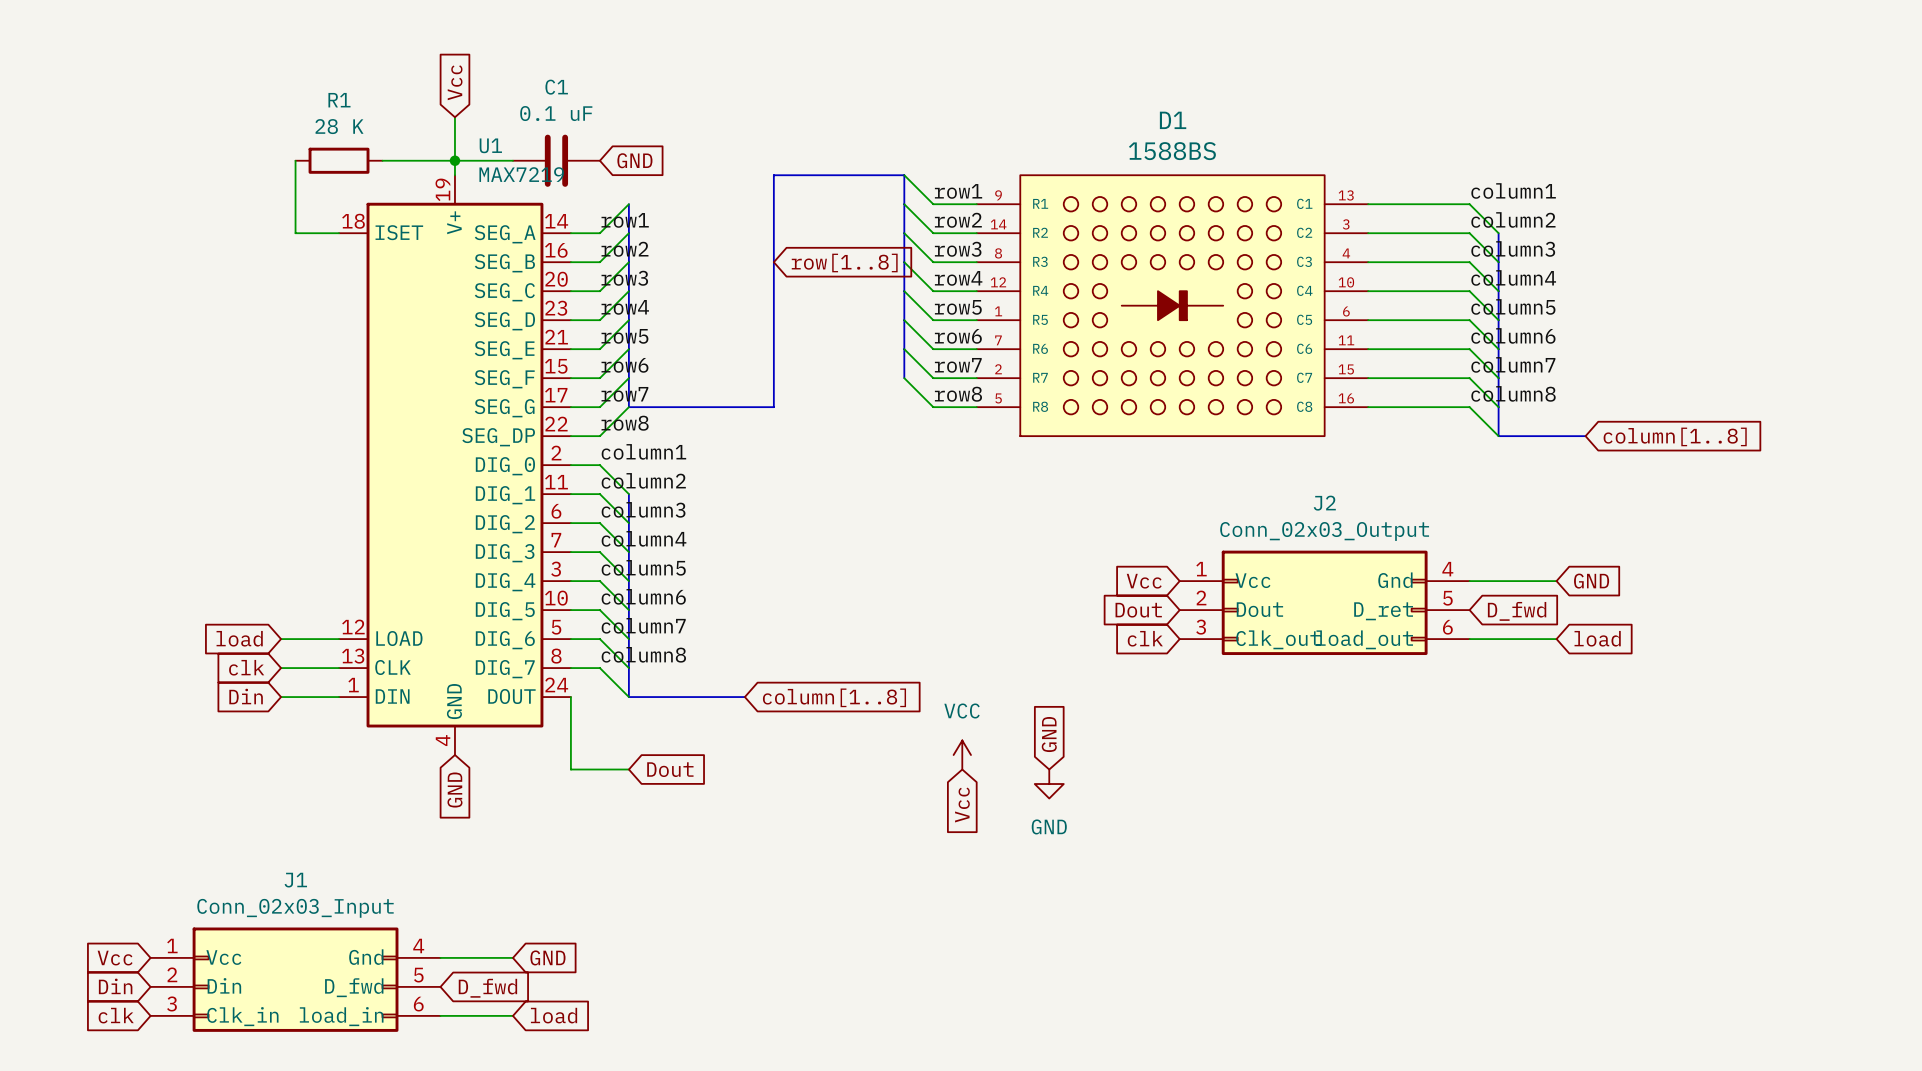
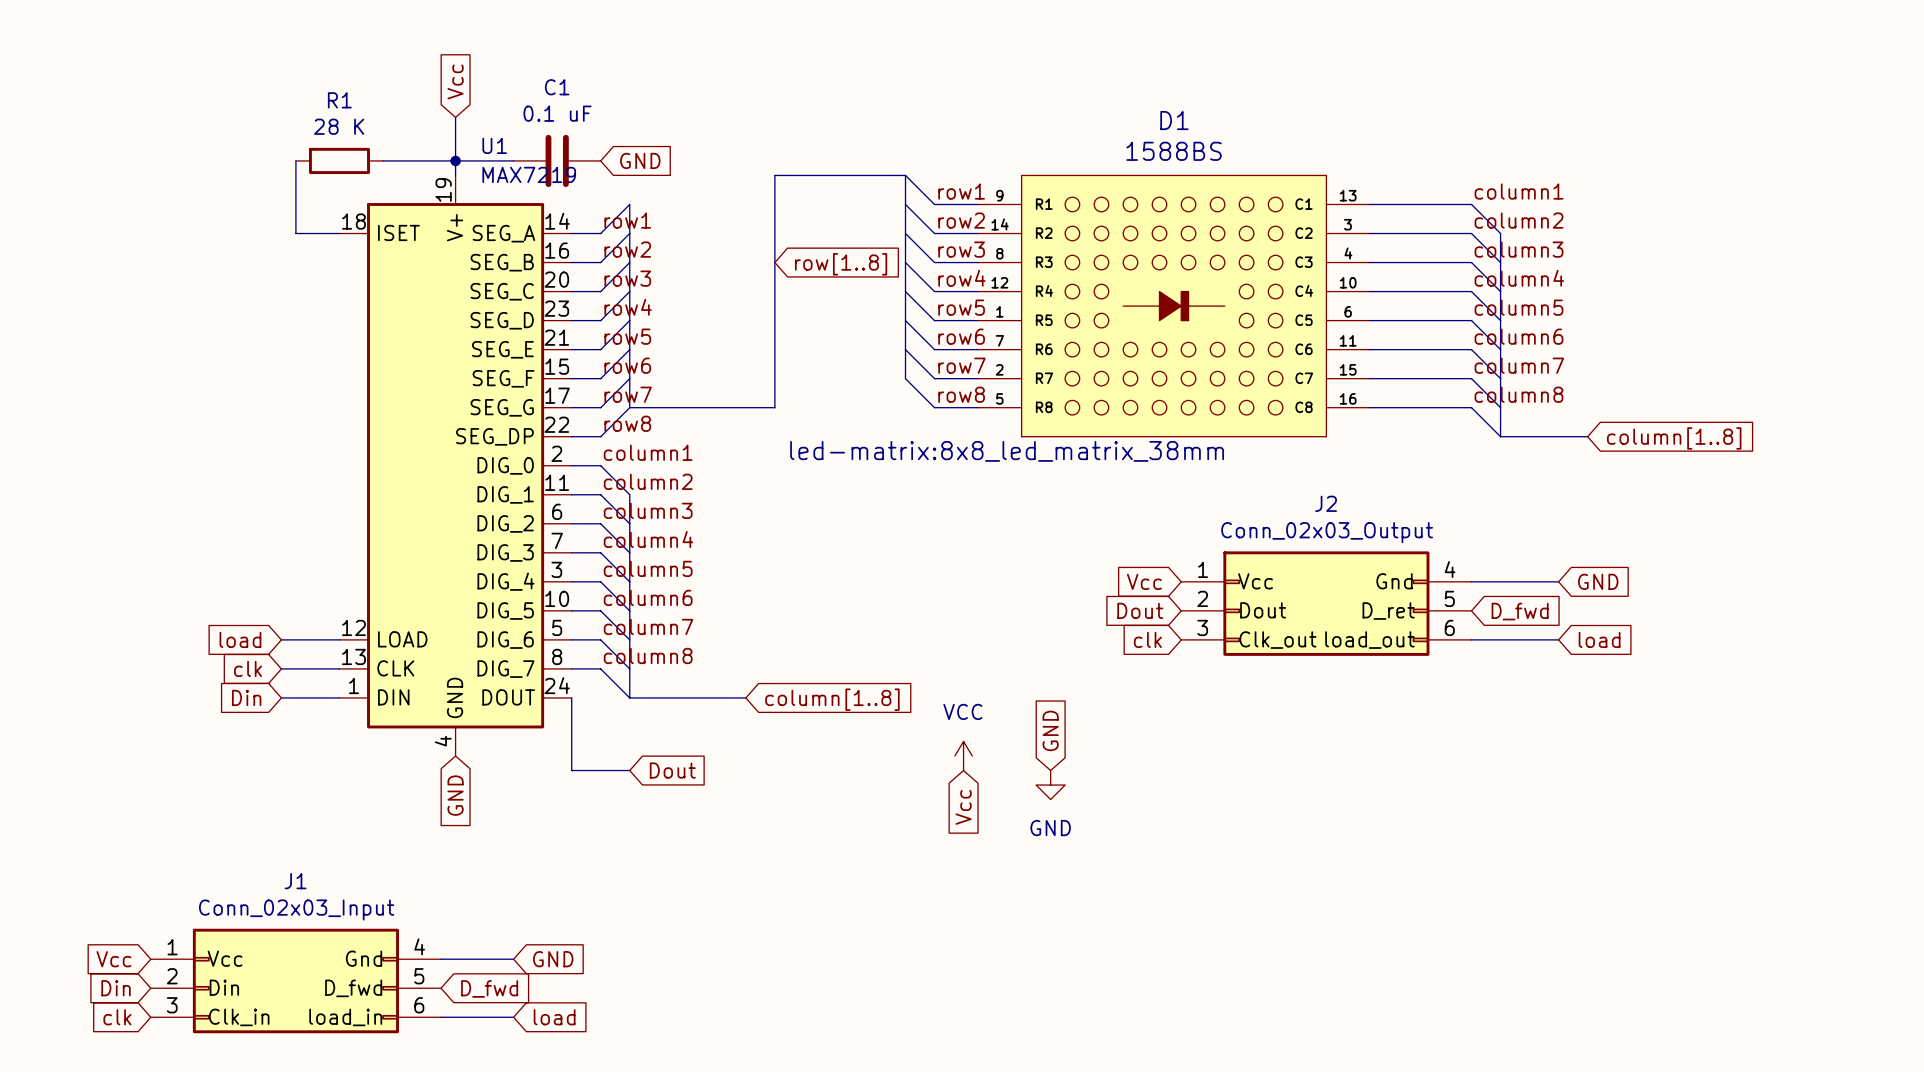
D1 text: none -> led-matrix:8x8_led_matrix_38mm (1007, 451)

